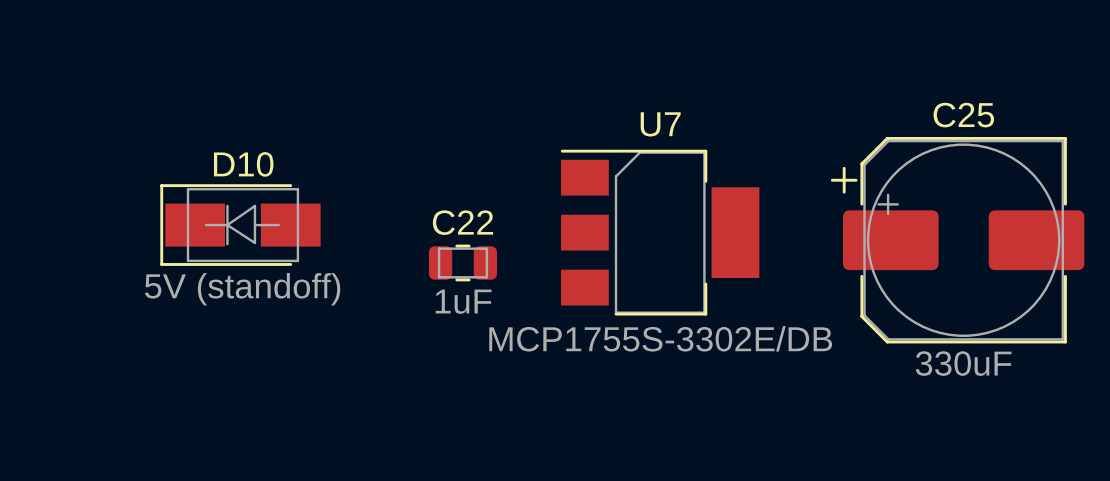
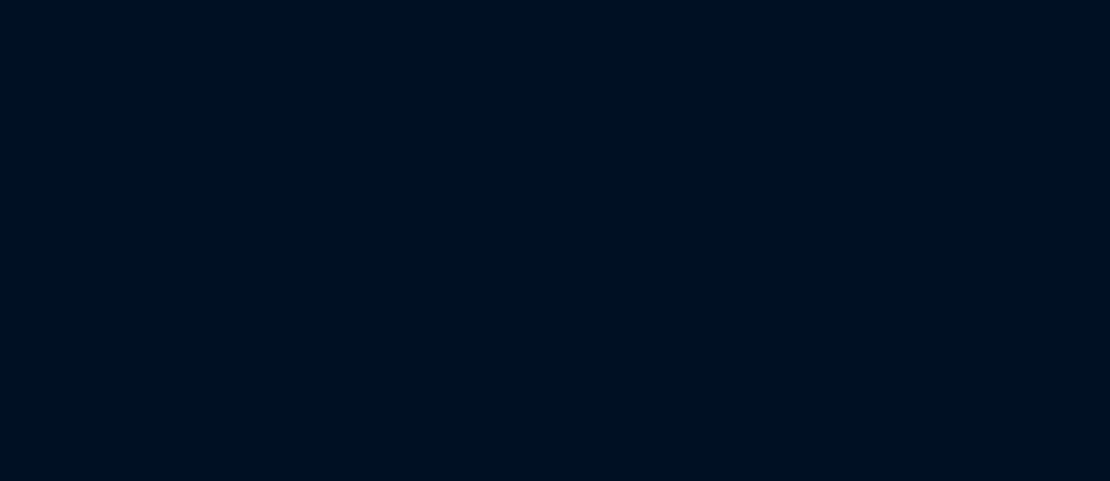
D10: 5V (standoff) (240, 225) -> none
U7: MCP1755S-3302E/DB (660, 232) -> none
C25: 330uF (957, 240) -> none
C22: 1uF (462, 262) -> none

